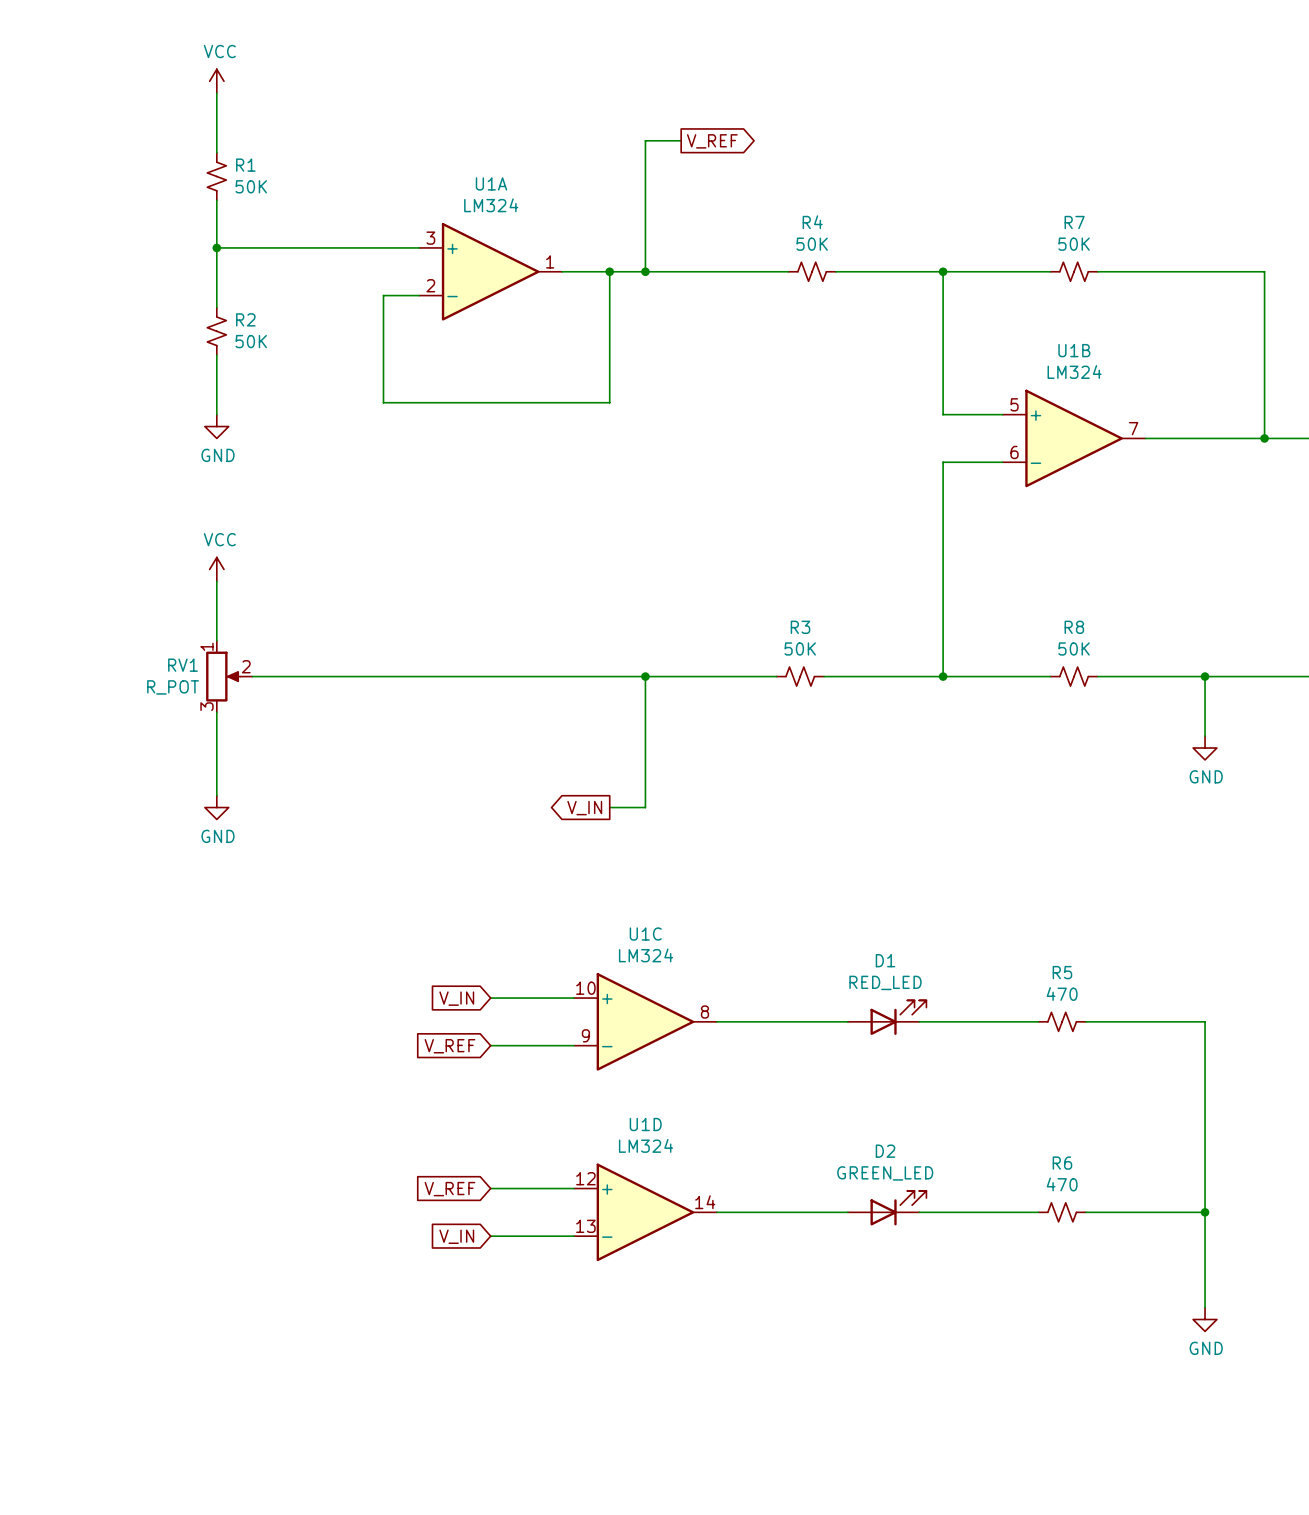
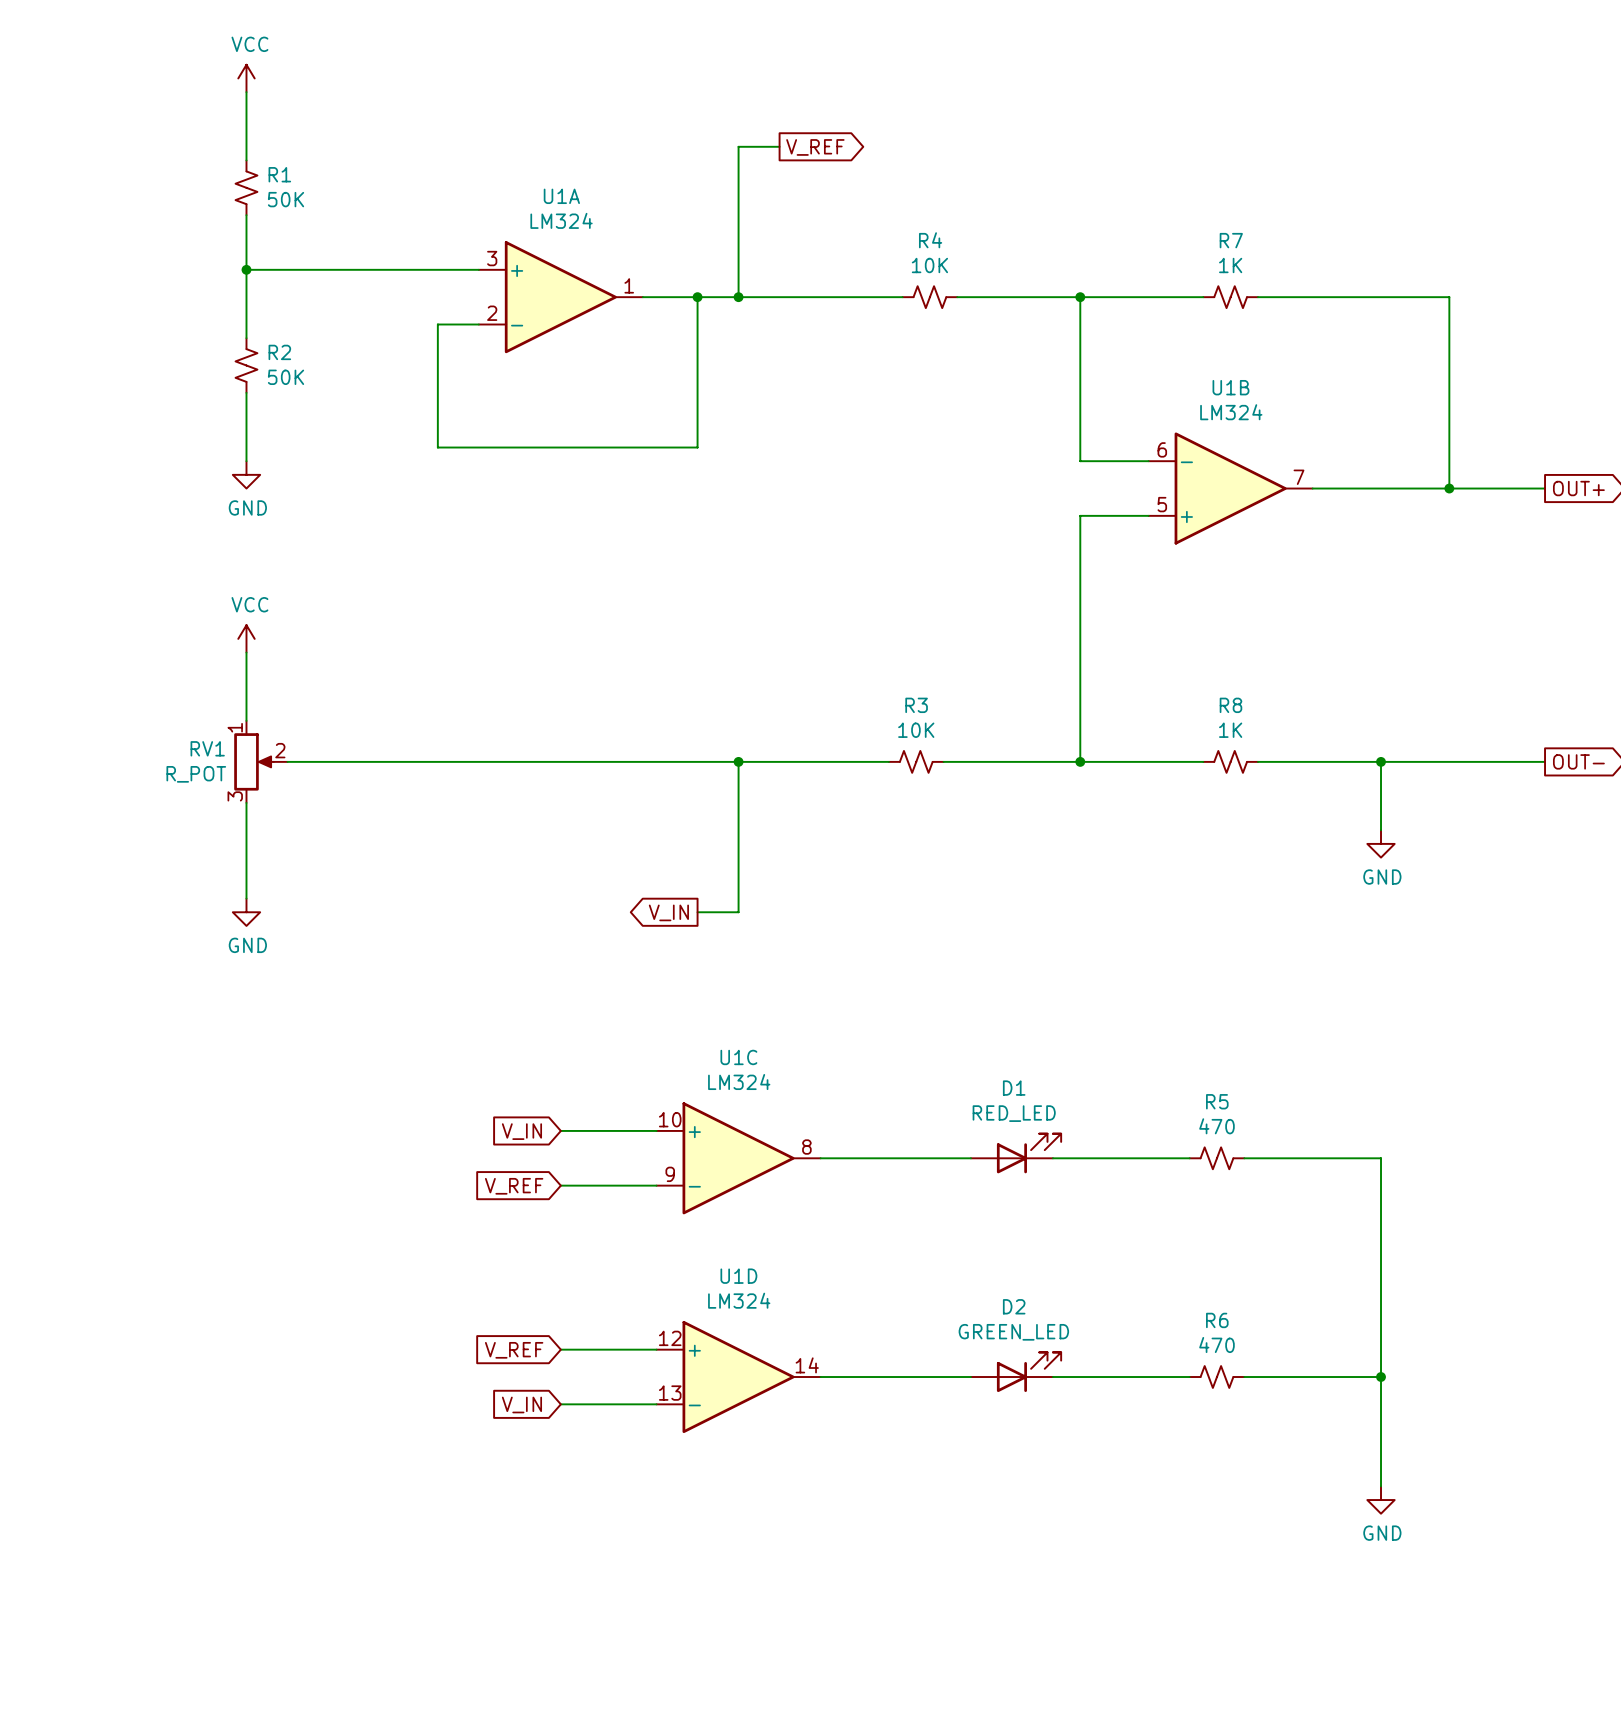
R4 value: 50K (812, 244) -> 10K (929, 265)
R7 value: 50K (1074, 244) -> 1K (1230, 265)
U1B flip: as is (1074, 438) -> up-down (1230, 488)
R3 value: 50K (800, 648) -> 10K (916, 730)
R8 value: 50K (1074, 648) -> 1K (1230, 730)

